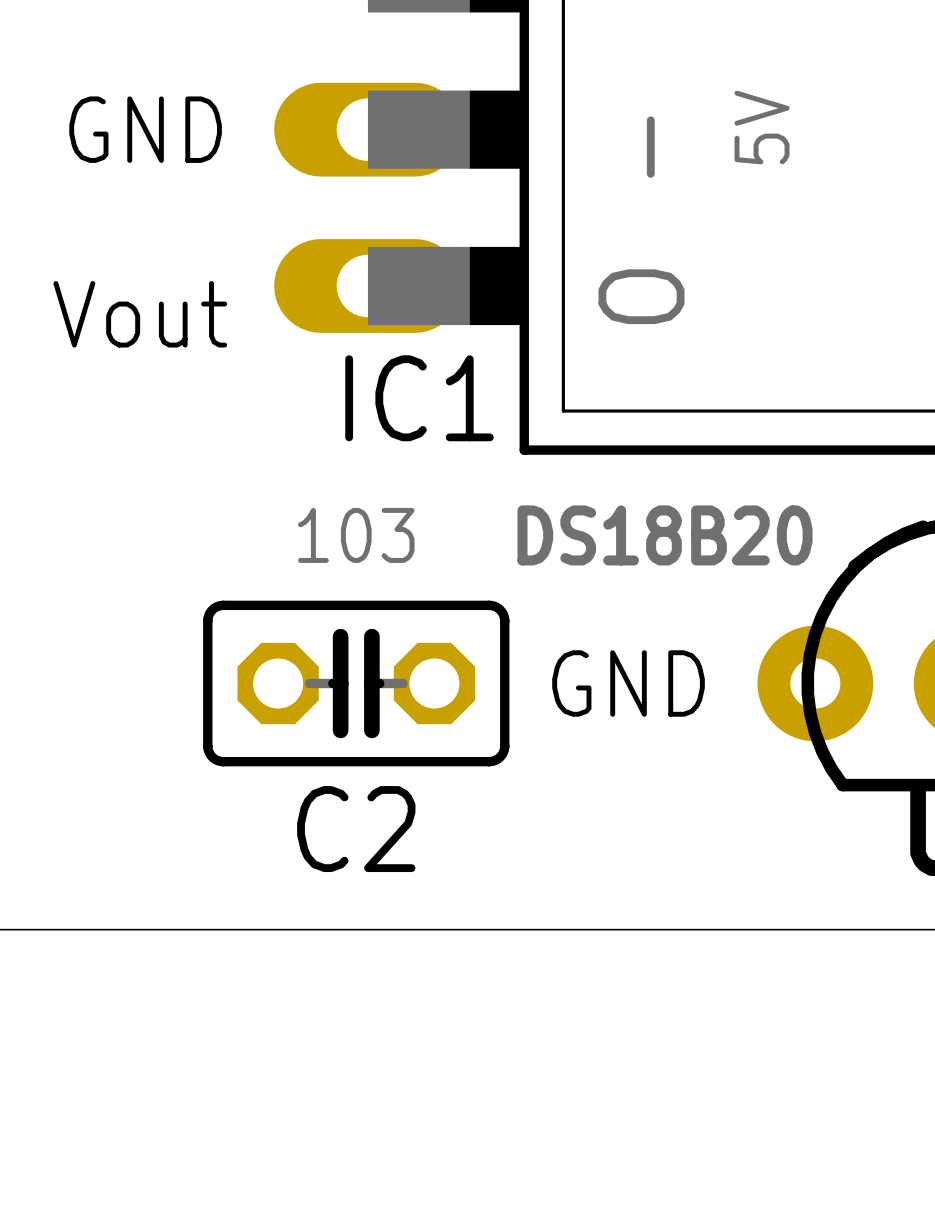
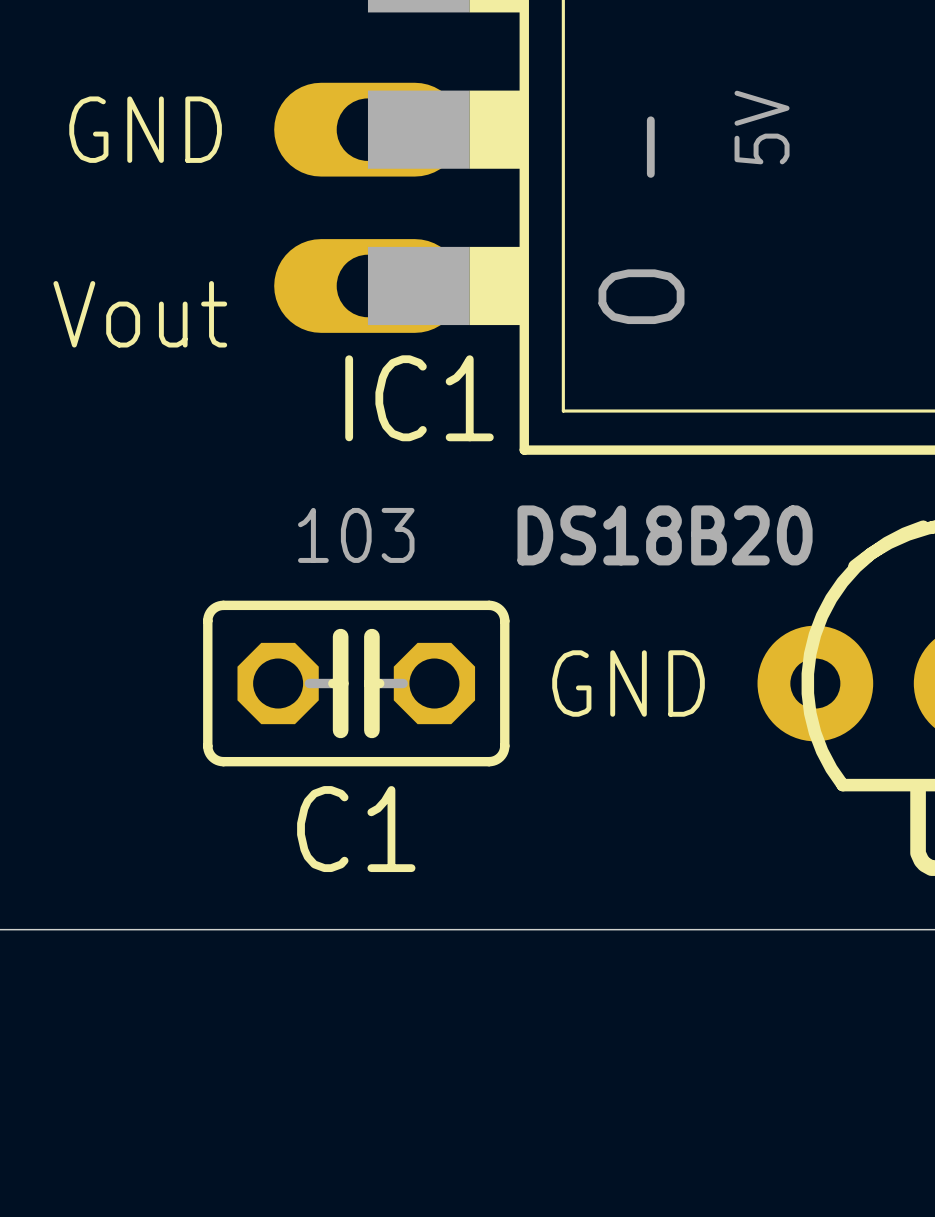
C2 name: C2 (356, 829) -> C1 (356, 829)

